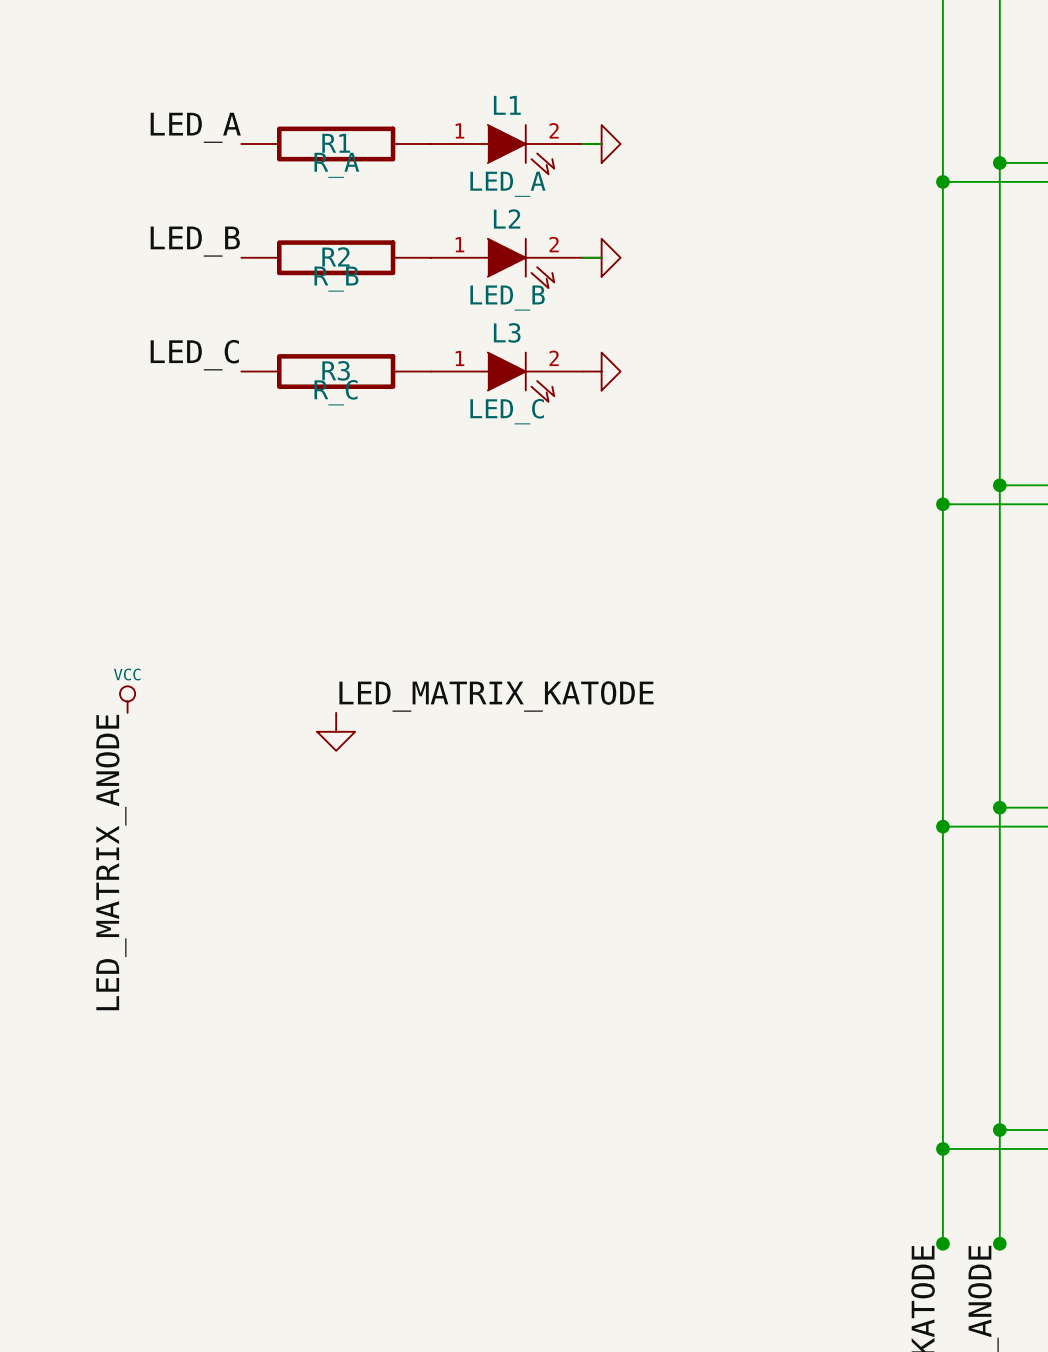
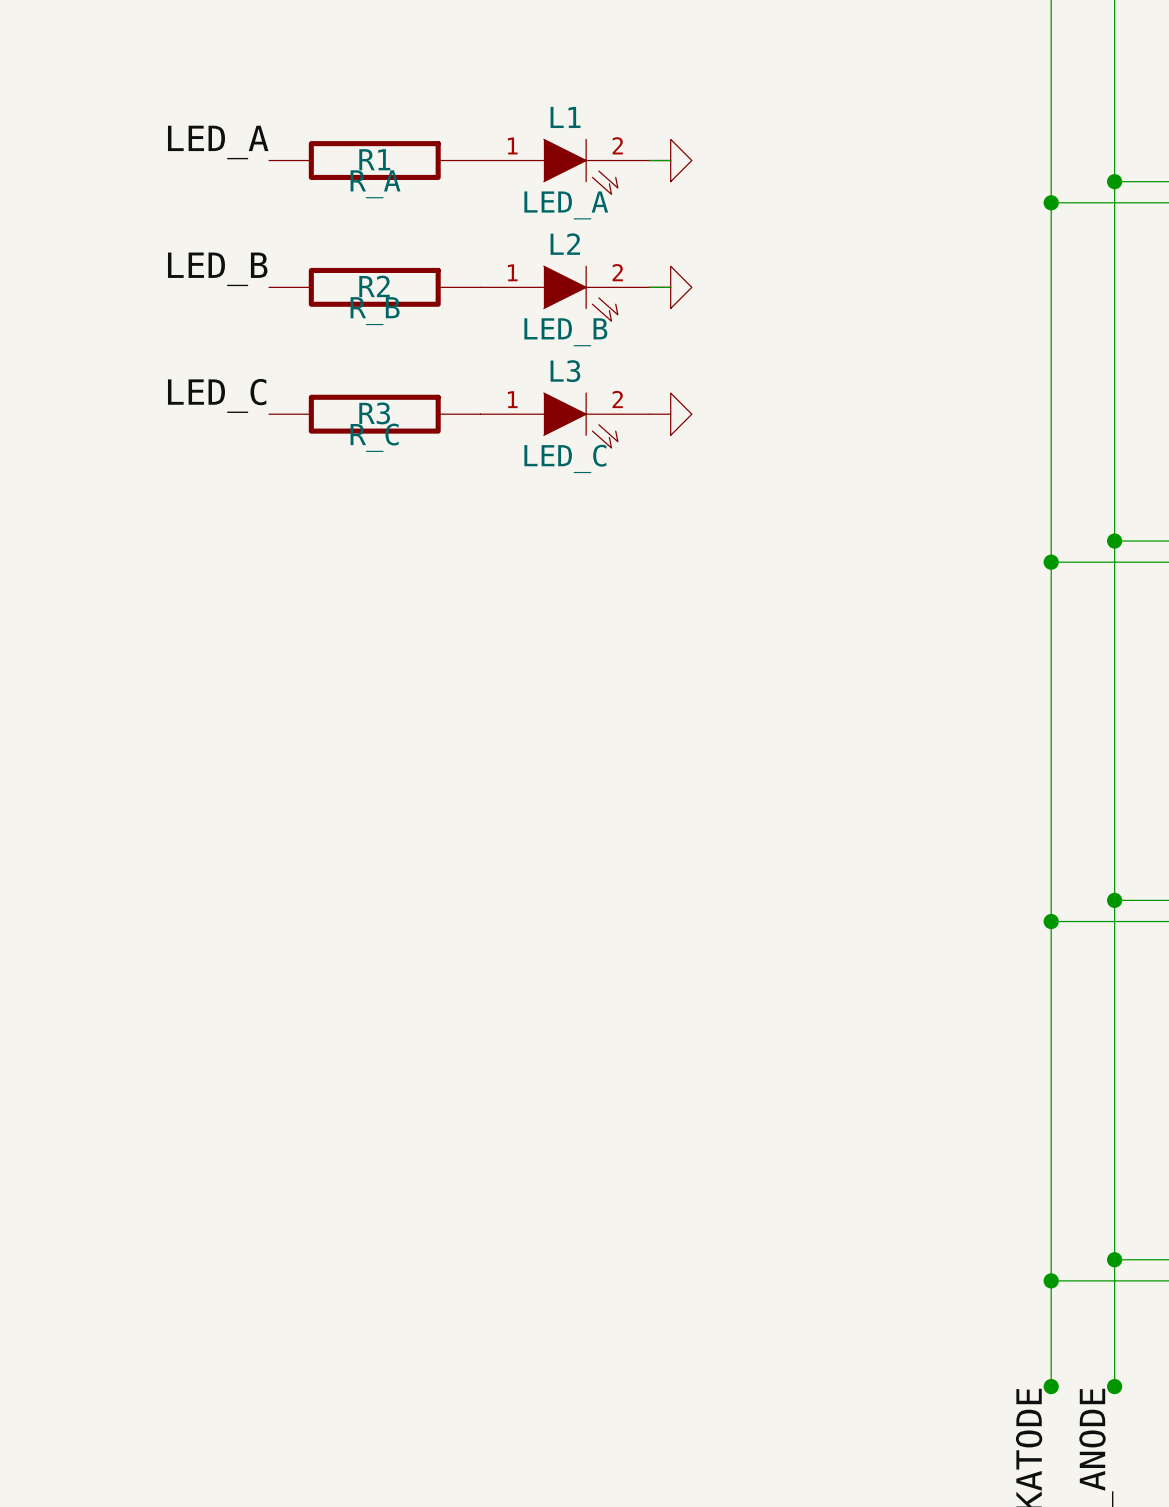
label: LED_MATRIX_KATODE (496, 696) -> none
power symbol: VCC (127, 699) -> none
power symbol: (336, 731) -> none
label: LED_MATRIX_ANODE (111, 862) -> none

